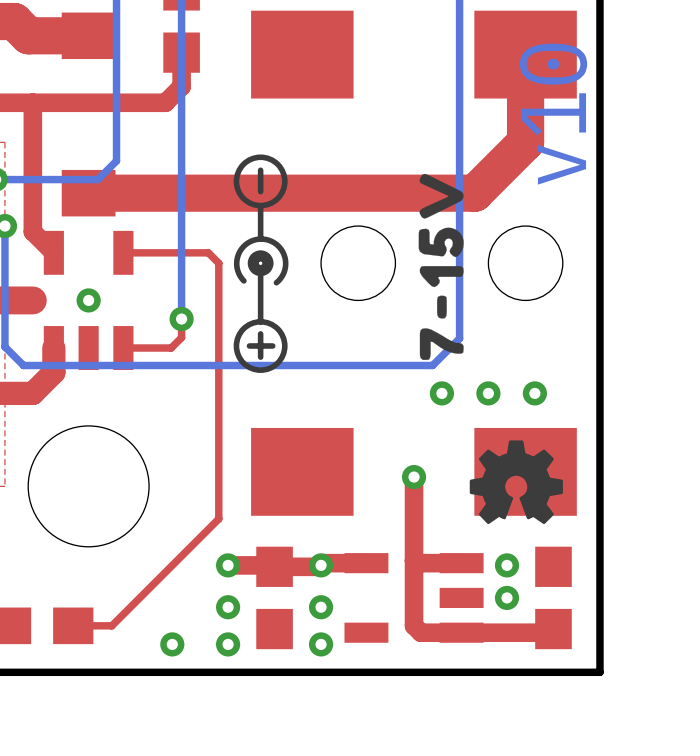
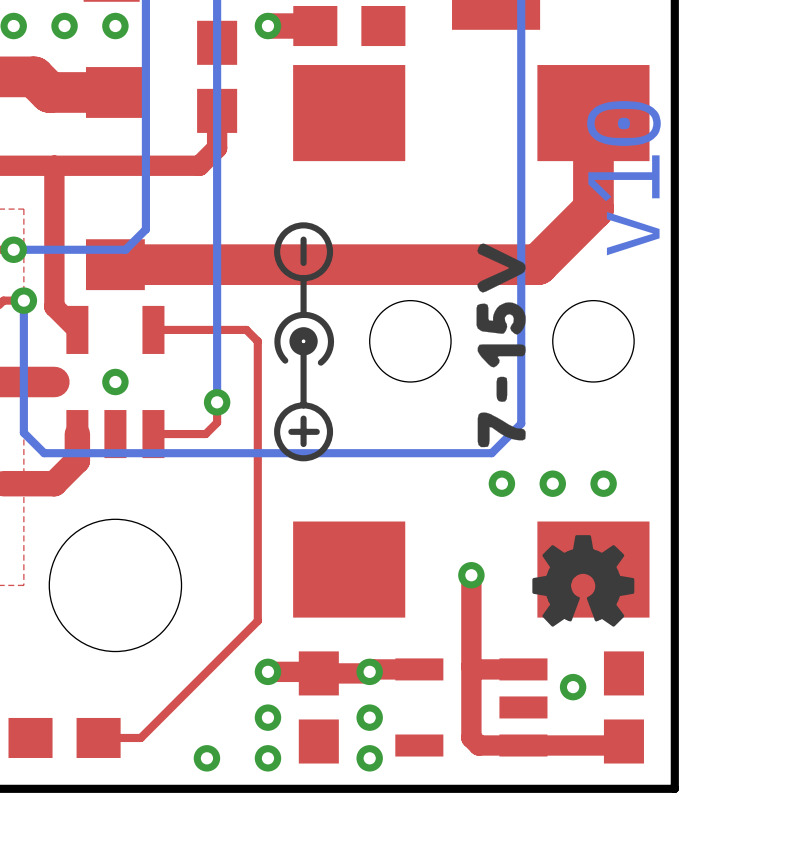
via: (507, 565) -> none
via: none -> (573, 687)
via: (507, 597) -> none

